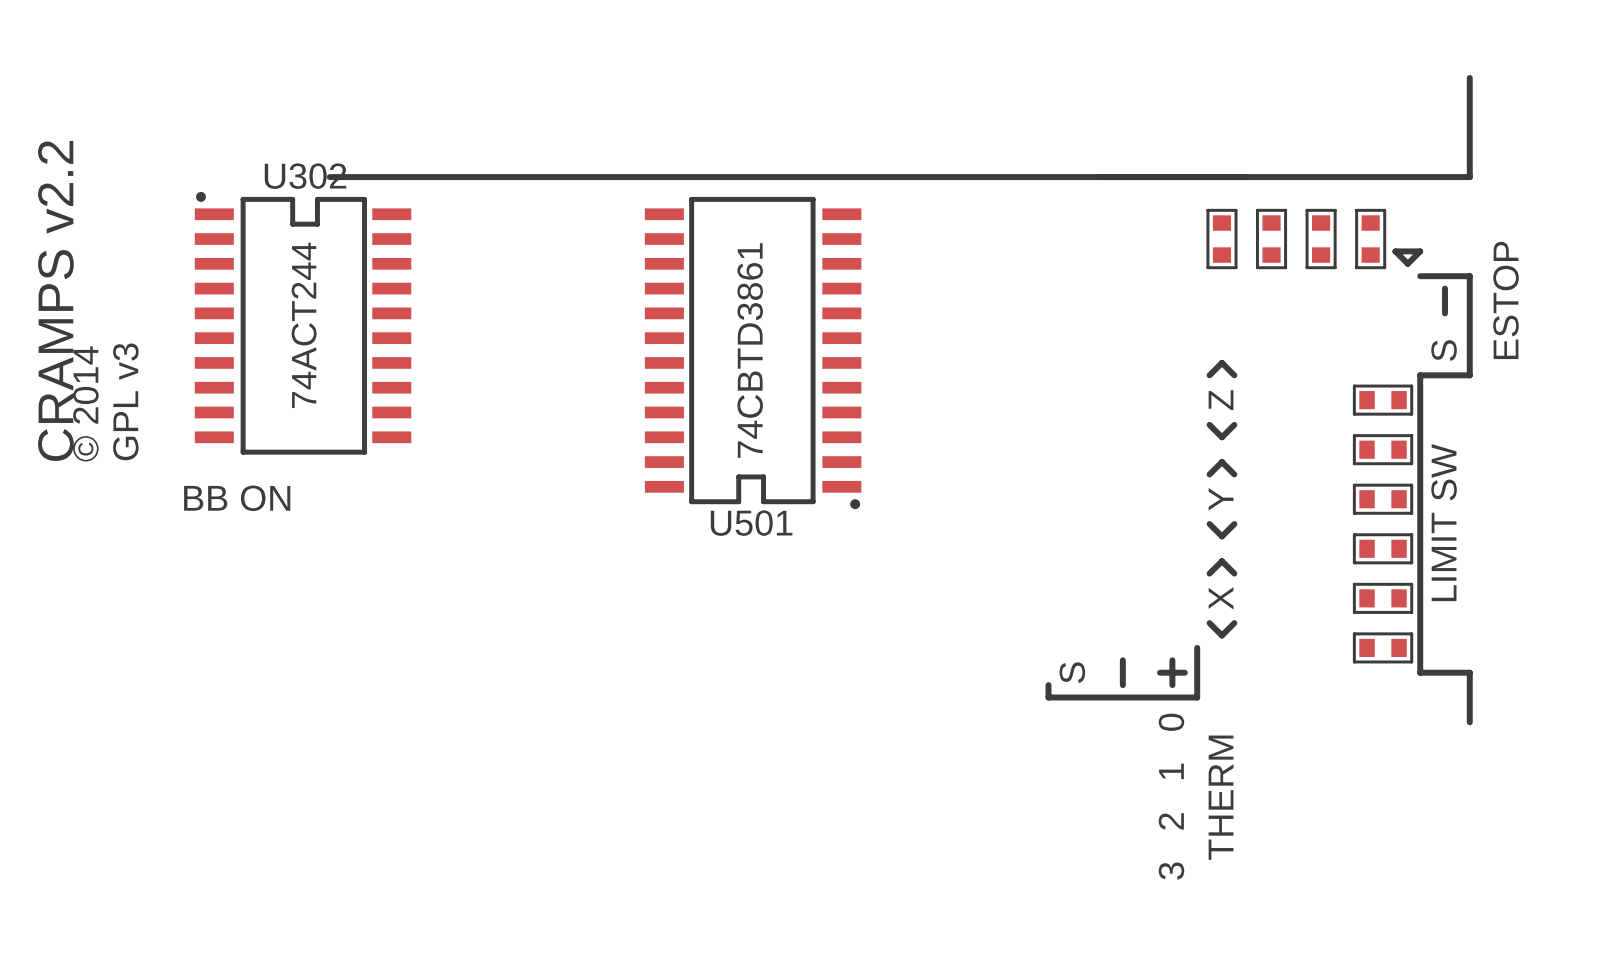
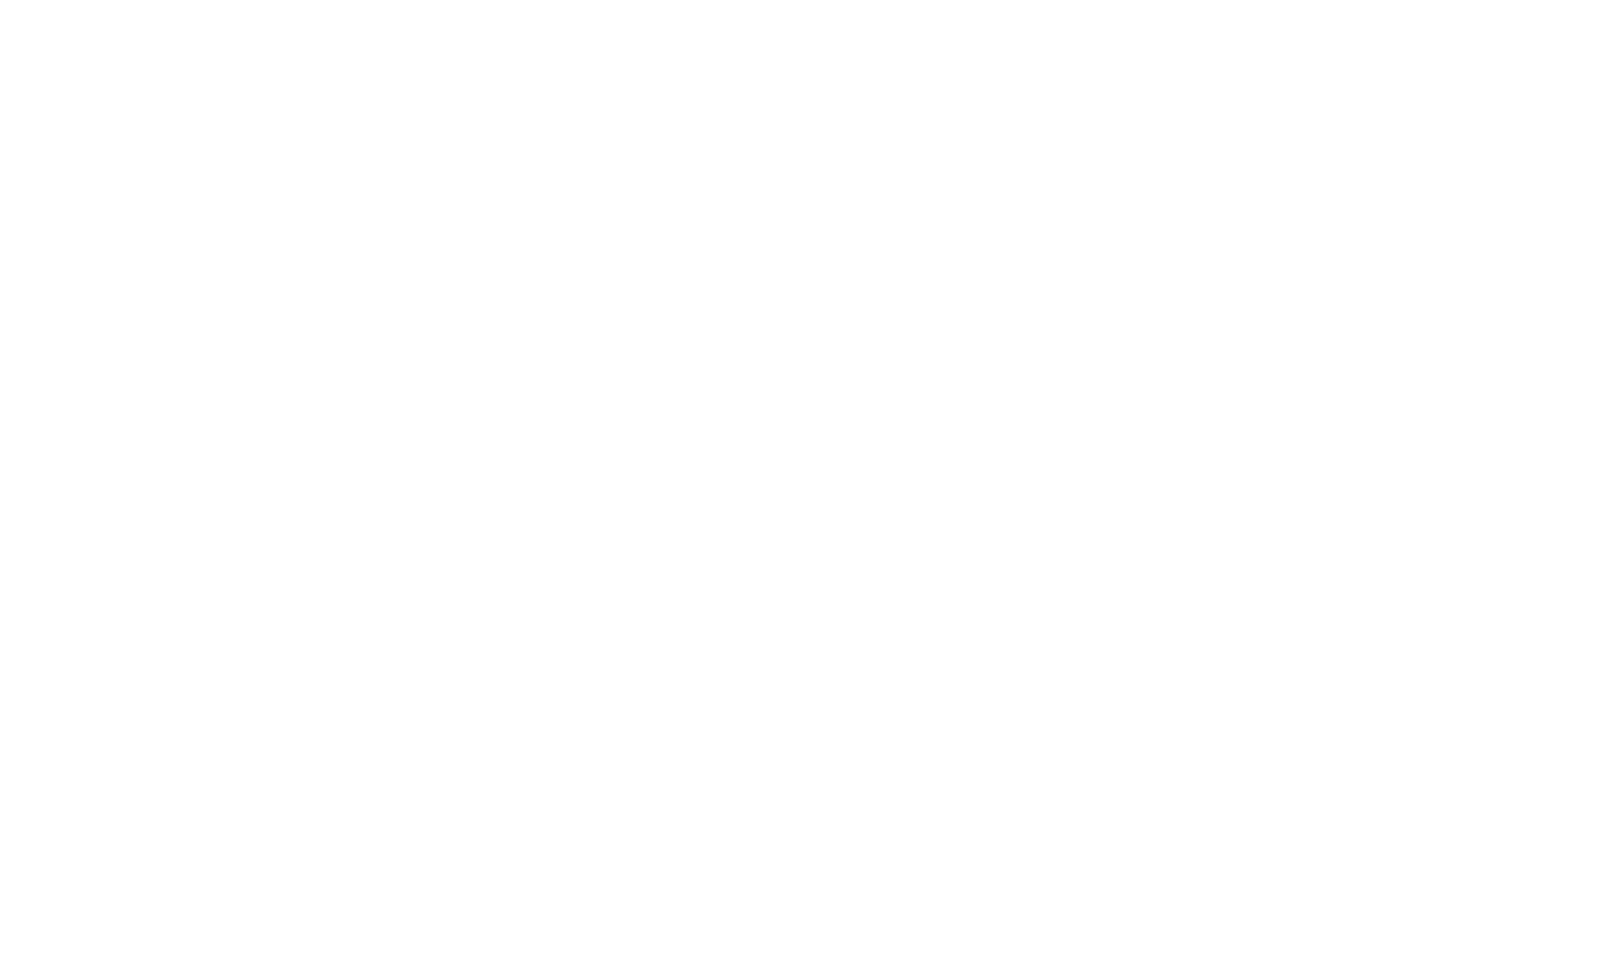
line: (1469, 77) (1469, 177) (329, 177) -> none
part: (1221, 239) -> none
part: (1271, 239) -> none
part: (1321, 239) -> none
part: (1370, 239) -> none
line: (1395, 251) (1420, 251) (1407, 263) (1395, 251) -> none
line: (1420, 276) (1469, 276) (1469, 375) (1420, 375) (1420, 672) (1469, 672) (1469, 722) -> none
line: (1445, 288) (1445, 313) -> none
text: CRAMPS v2.2 (55, 300) -> none
text: ESTOP (1506, 300) -> none
U302: 74ACT244 (303, 323) -> none
text: S (1444, 350) -> none
U501: 74CBTD3861 (753, 353) -> none
line: (1209, 375) (1221, 362) (1234, 375) -> none
text: Z (1221, 400) -> none
part: (1383, 400) -> none
text: GPL v3 (125, 401) -> none
text: © 2014 (85, 403) -> none
line: (1209, 424) (1221, 437) (1234, 424) -> none
part: (1383, 449) -> none
line: (1209, 474) (1221, 462) (1234, 474) -> none
text: BB ON (237, 498) -> none
text: Y (1221, 499) -> none
part: (1383, 499) -> none
text: LIMIT SW (1444, 522) -> none
line: (1209, 524) (1221, 536) (1234, 524) -> none
part: (1383, 548) -> none
line: (1209, 573) (1221, 561) (1234, 573) -> none
text: X (1221, 598) -> none
part: (1383, 598) -> none
line: (1209, 623) (1221, 635) (1234, 623) -> none
line: (1197, 647) (1197, 697) (1048, 697) (1048, 685) -> none
part: (1383, 647) -> none
line: (1122, 660) (1122, 685) -> none
line: (1172, 660) (1172, 685) -> none
text: S (1072, 672) -> none
line: (1160, 672) (1184, 672) -> none
text: 0 (1171, 722) -> none
text: 1 (1171, 771) -> none
text: THERM (1221, 797) -> none
text: 2 (1171, 821) -> none
text: 3 (1171, 871) -> none

